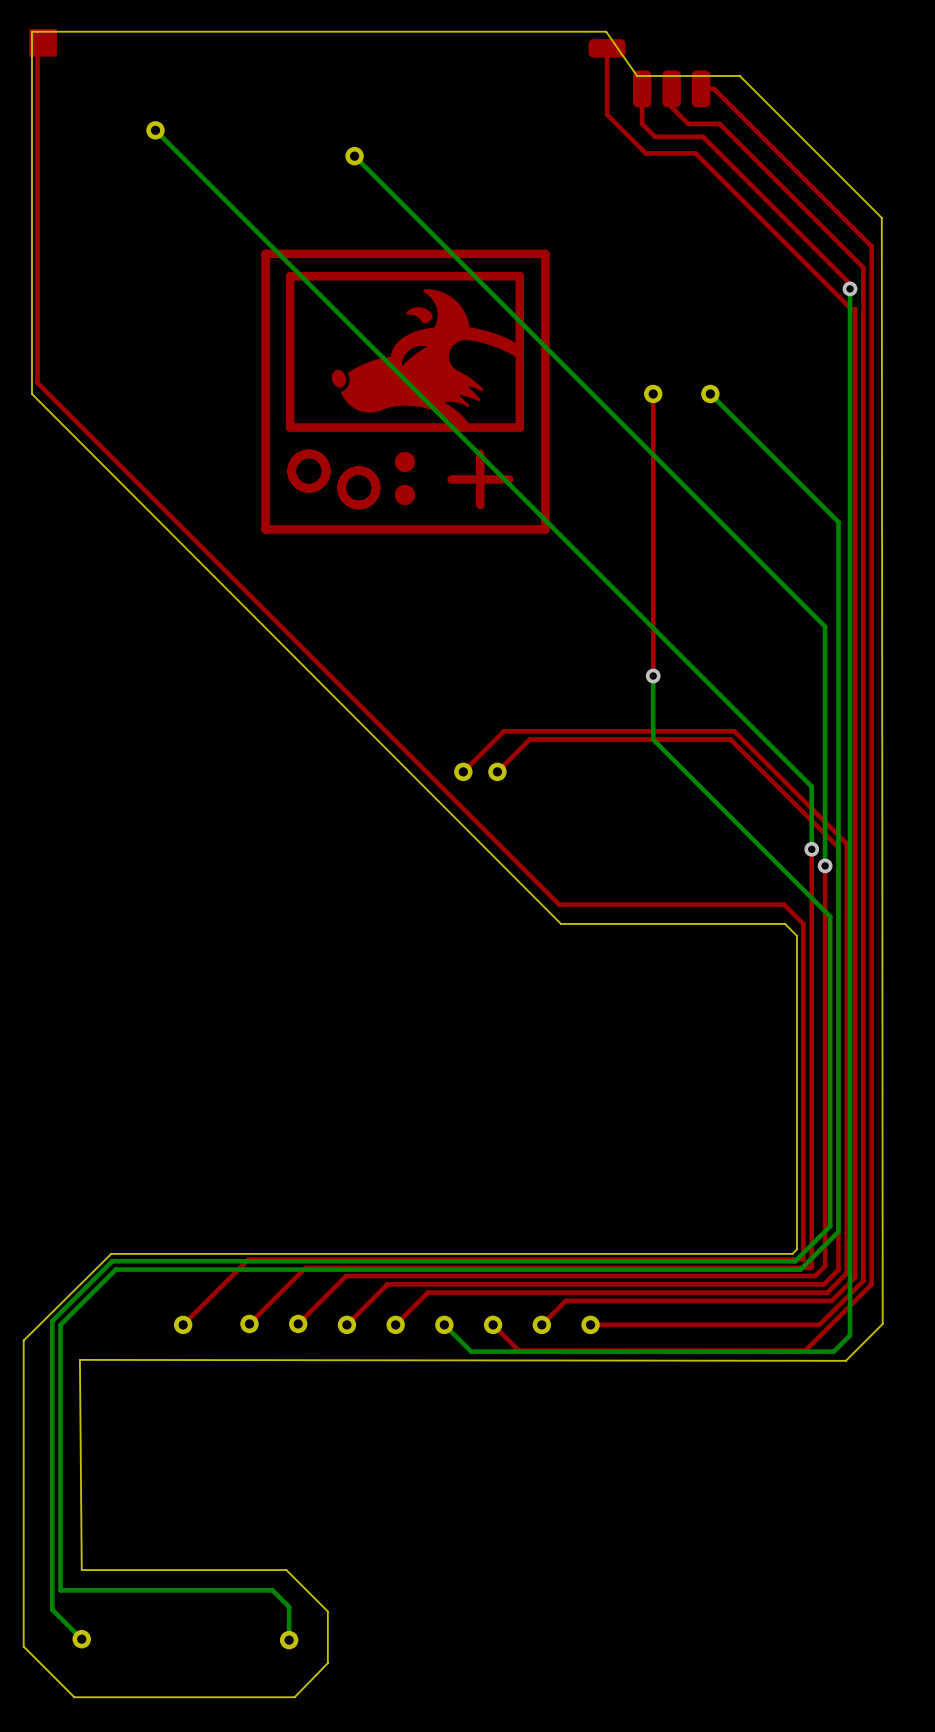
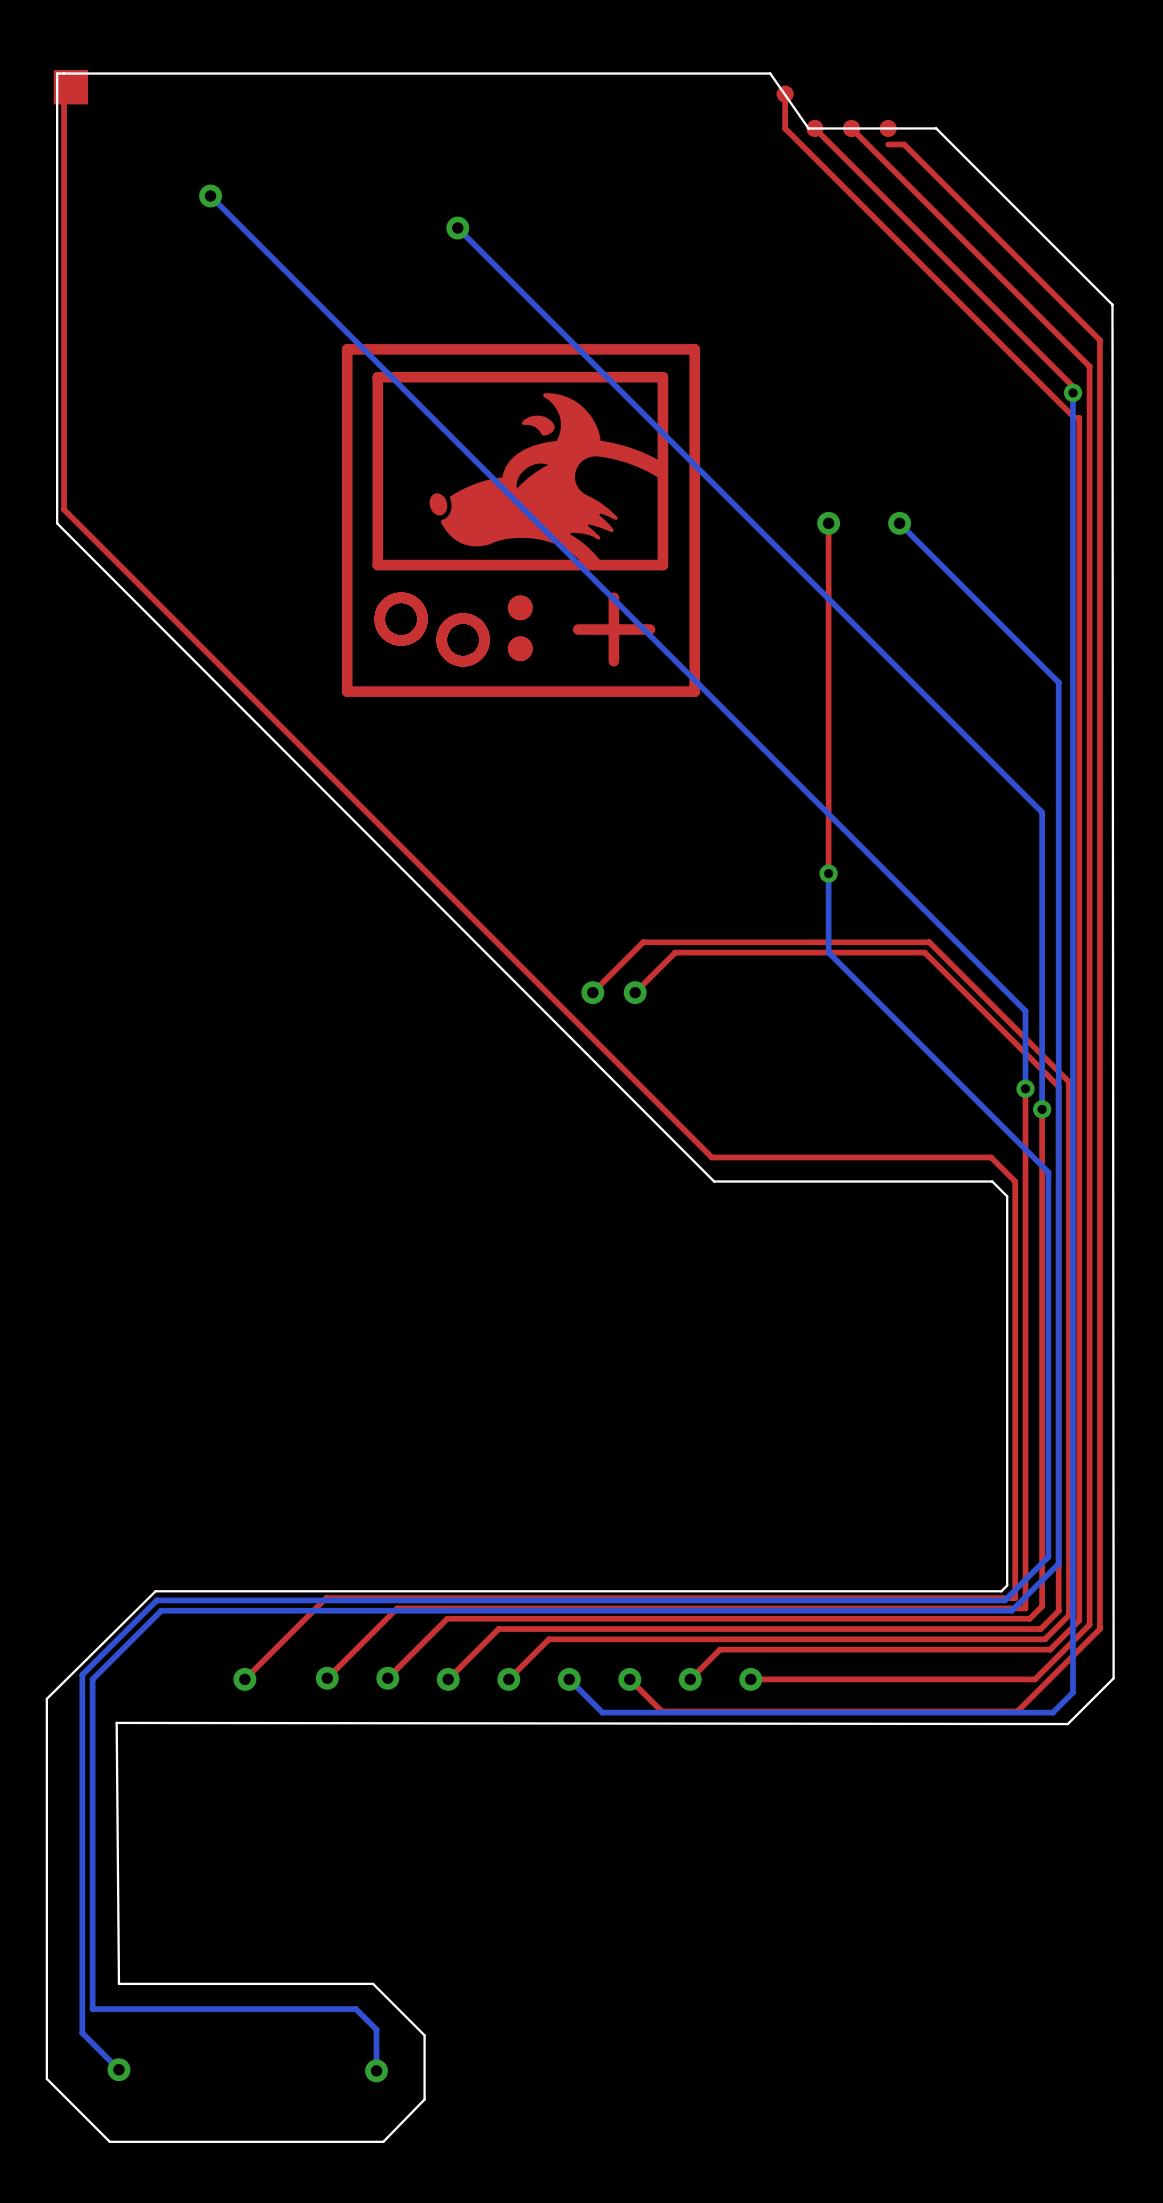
part footprint: [588, 39, 626, 58] -> [776, 85, 794, 103]
top track: (607, 48) (607, 114) (645, 153) (695, 153) -> (785, 94) (785, 128) (881, 224)
part footprint: [632, 70, 652, 108] -> [806, 119, 824, 138]
part footprint: [662, 70, 681, 108] -> [842, 119, 861, 138]
part footprint: [691, 70, 711, 108] -> [879, 119, 897, 138]
top track: (642, 88) (642, 123) (655, 136) (702, 136) -> (814, 128) (890, 204)
top track: (671, 88) (671, 107) (688, 123) (719, 123) -> (851, 128) (911, 187)

